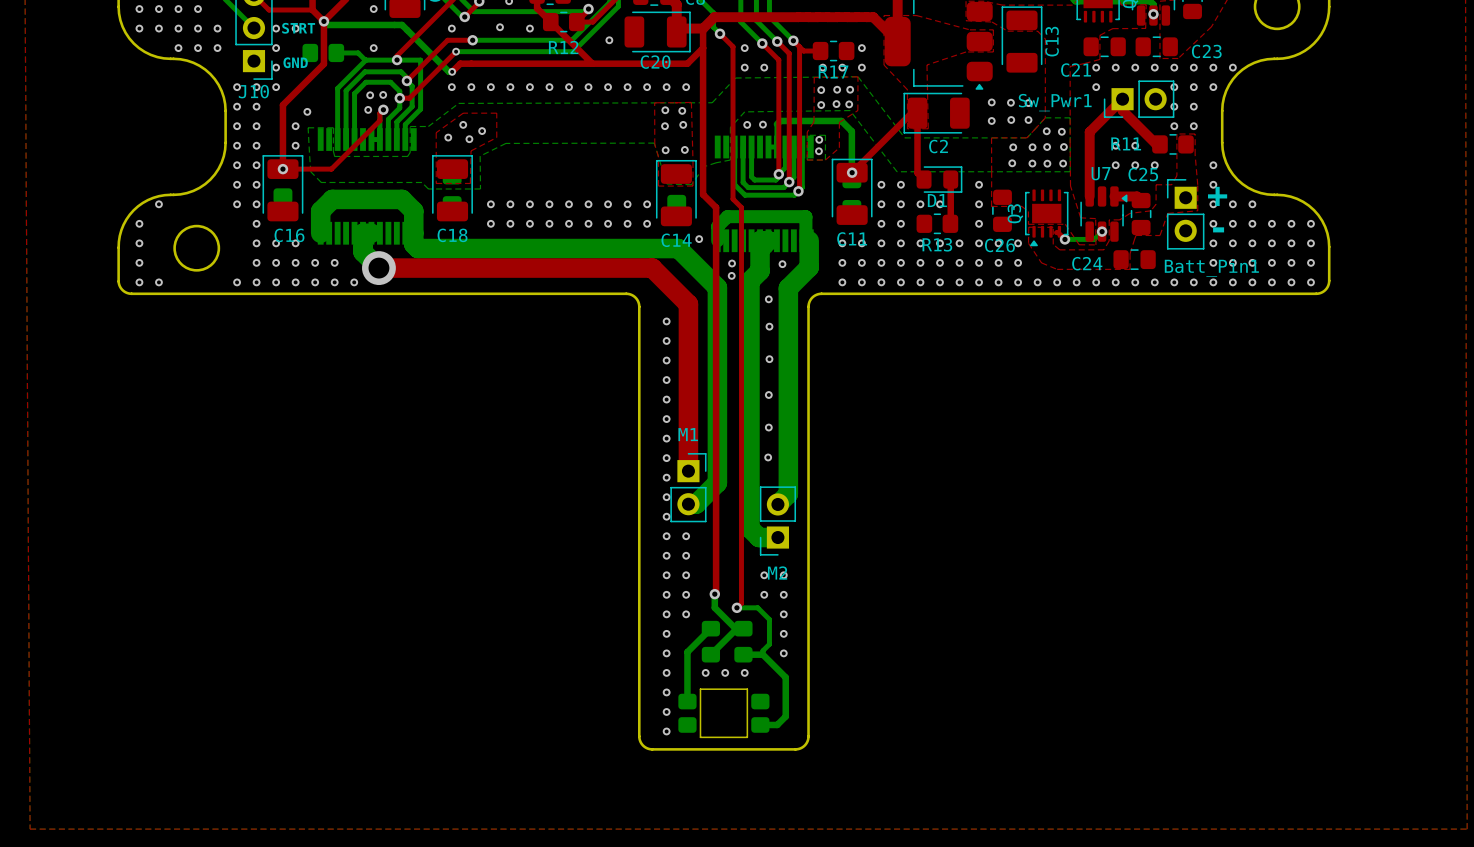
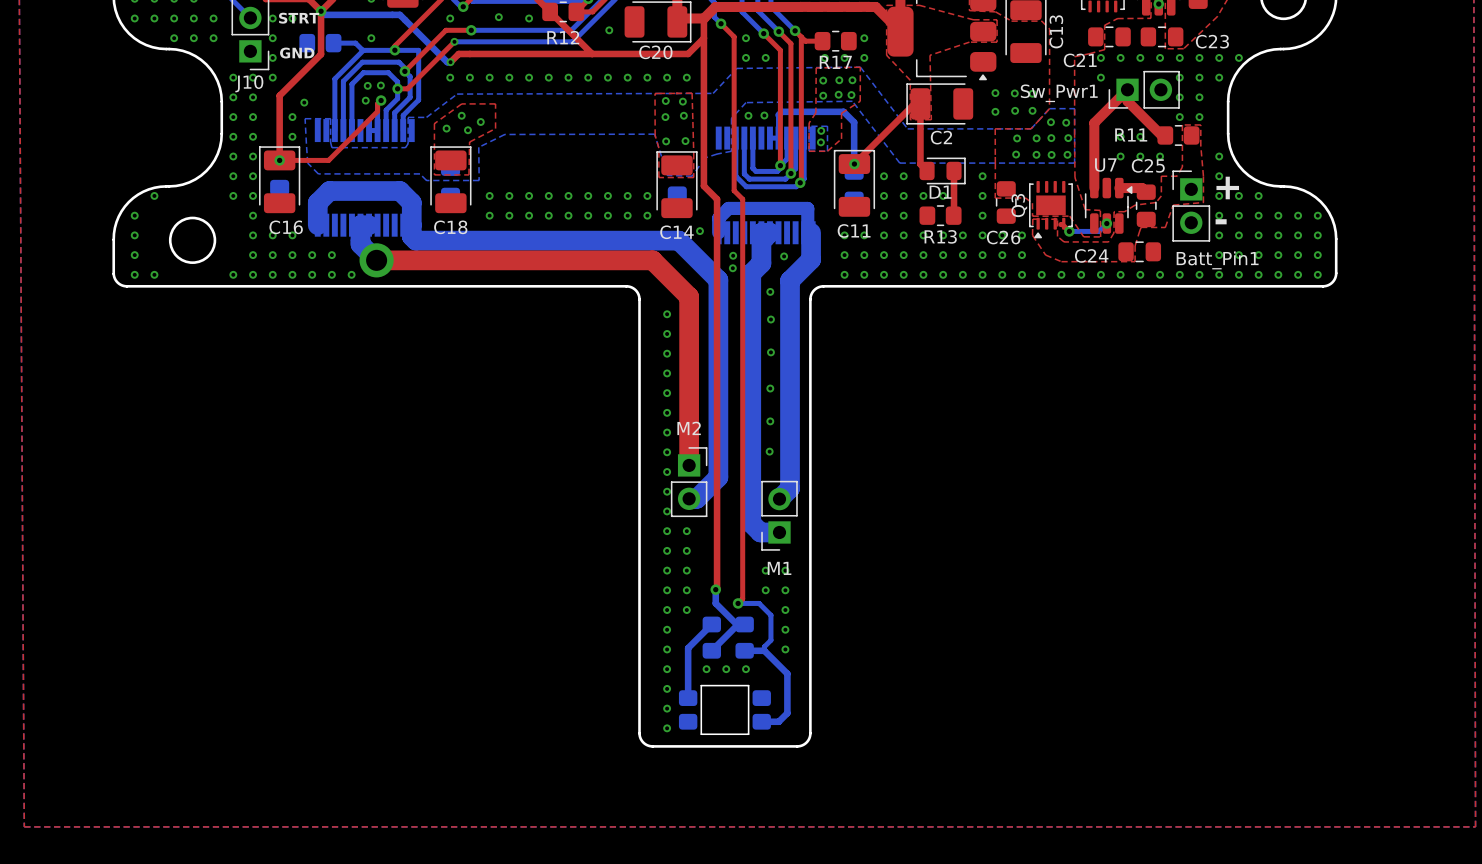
M1 name: M1 (688, 434) -> M2 (689, 428)
M2 name: M2 (777, 572) -> M1 (779, 568)

